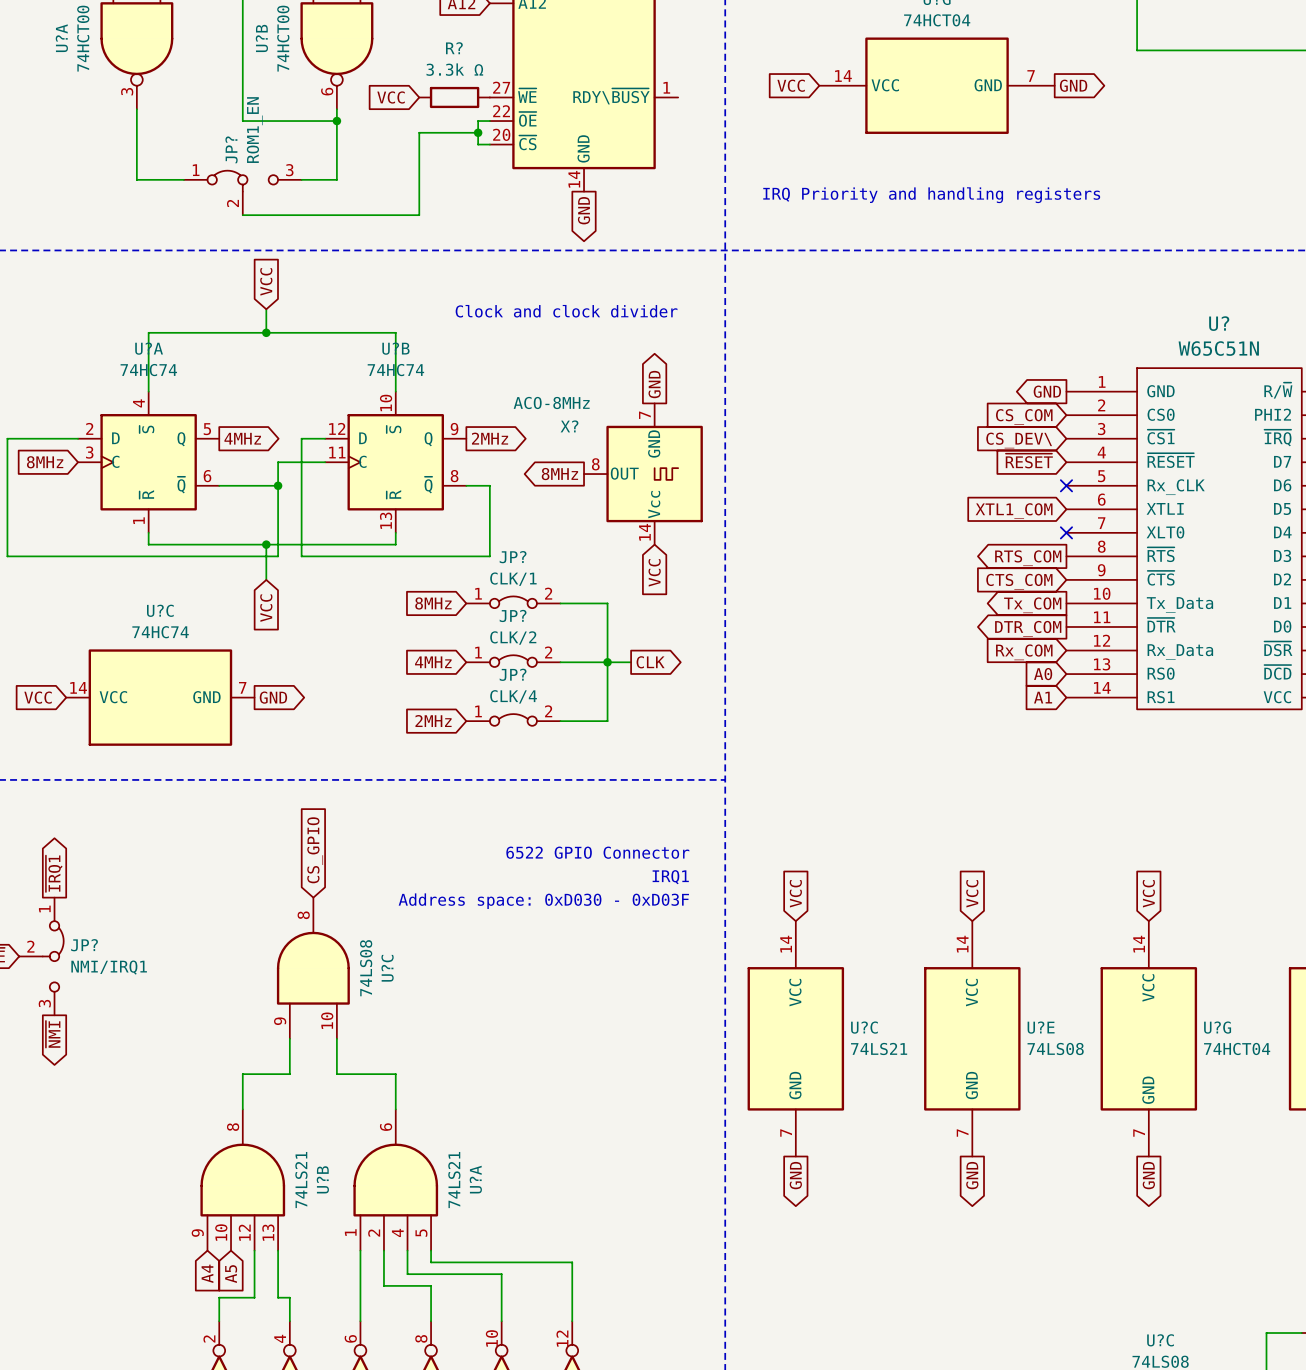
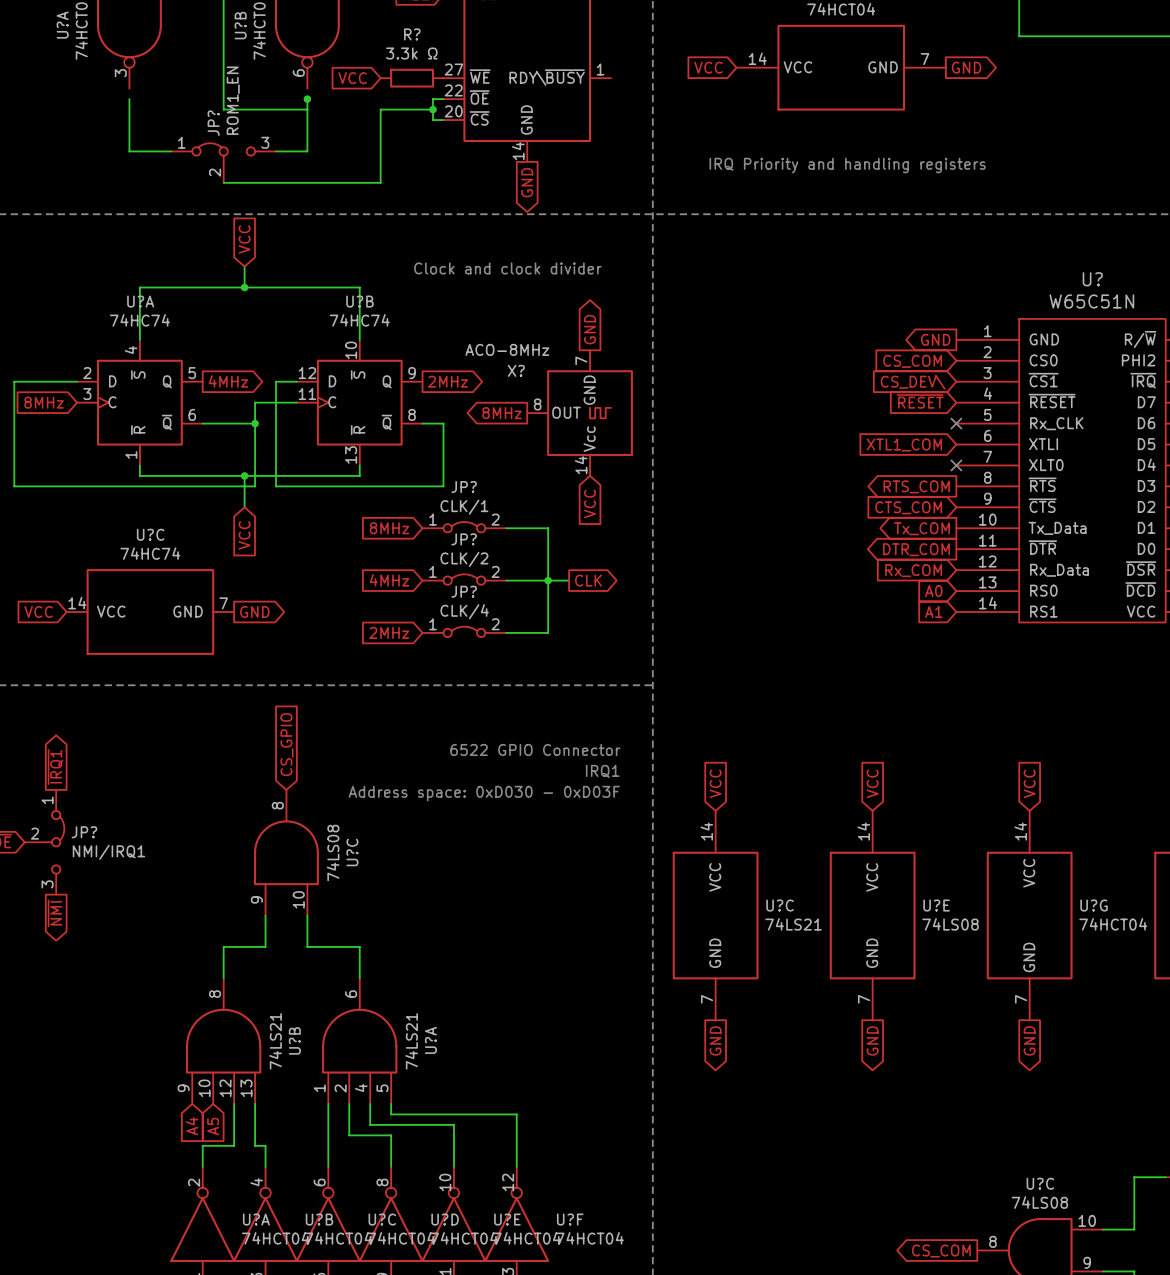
wire: (136, 109) (136, 121) -> none
wire: (336, 109) (336, 121) (242, 121) -> (307, 109) (223, 109) (223, 99)

